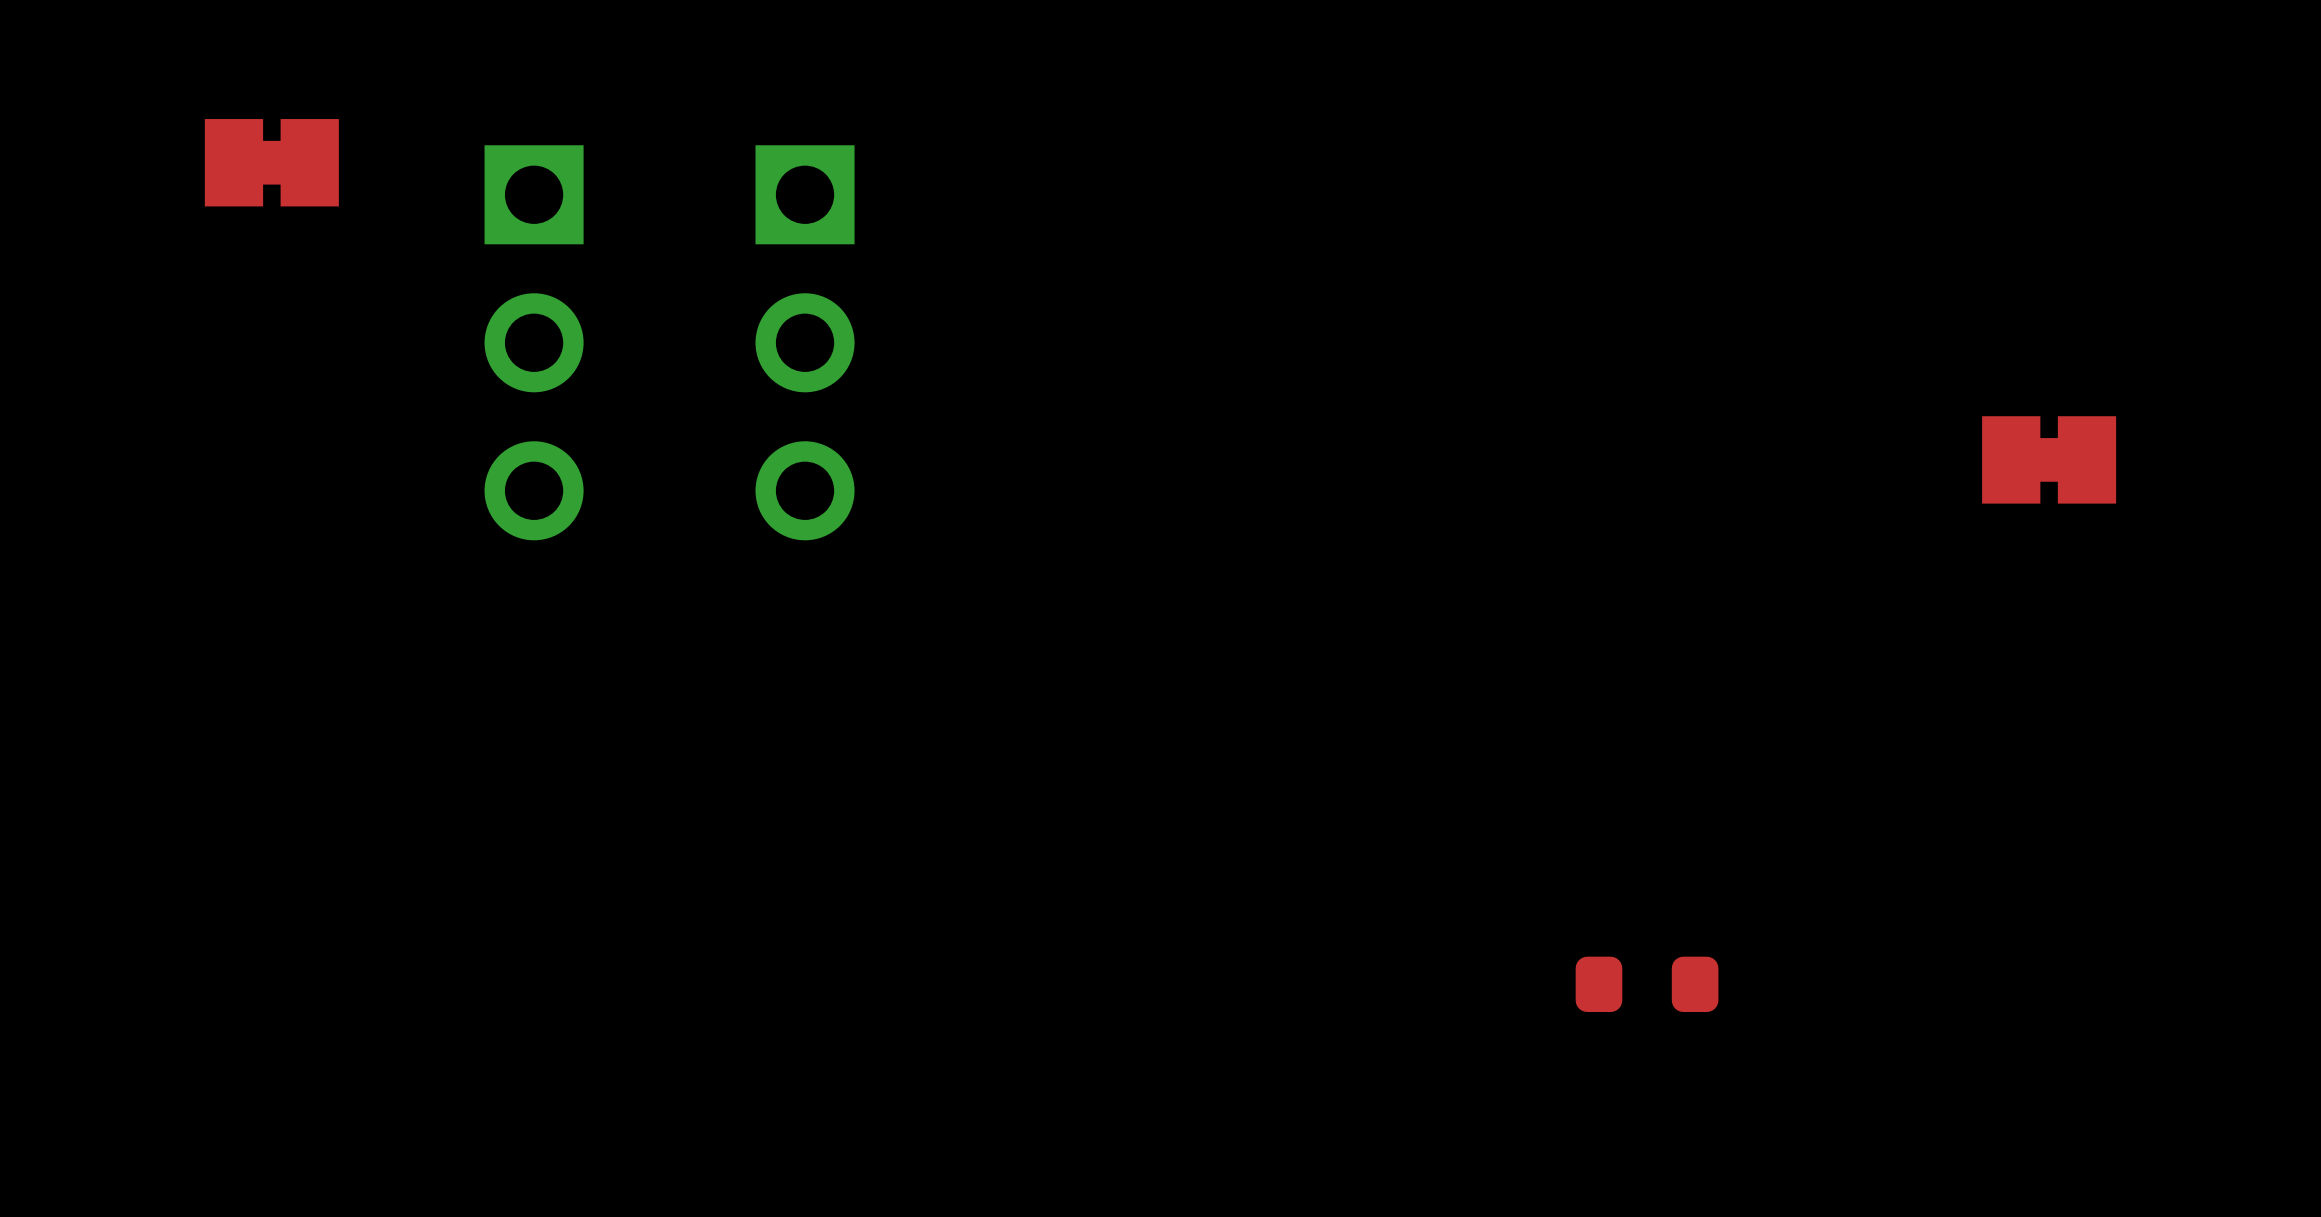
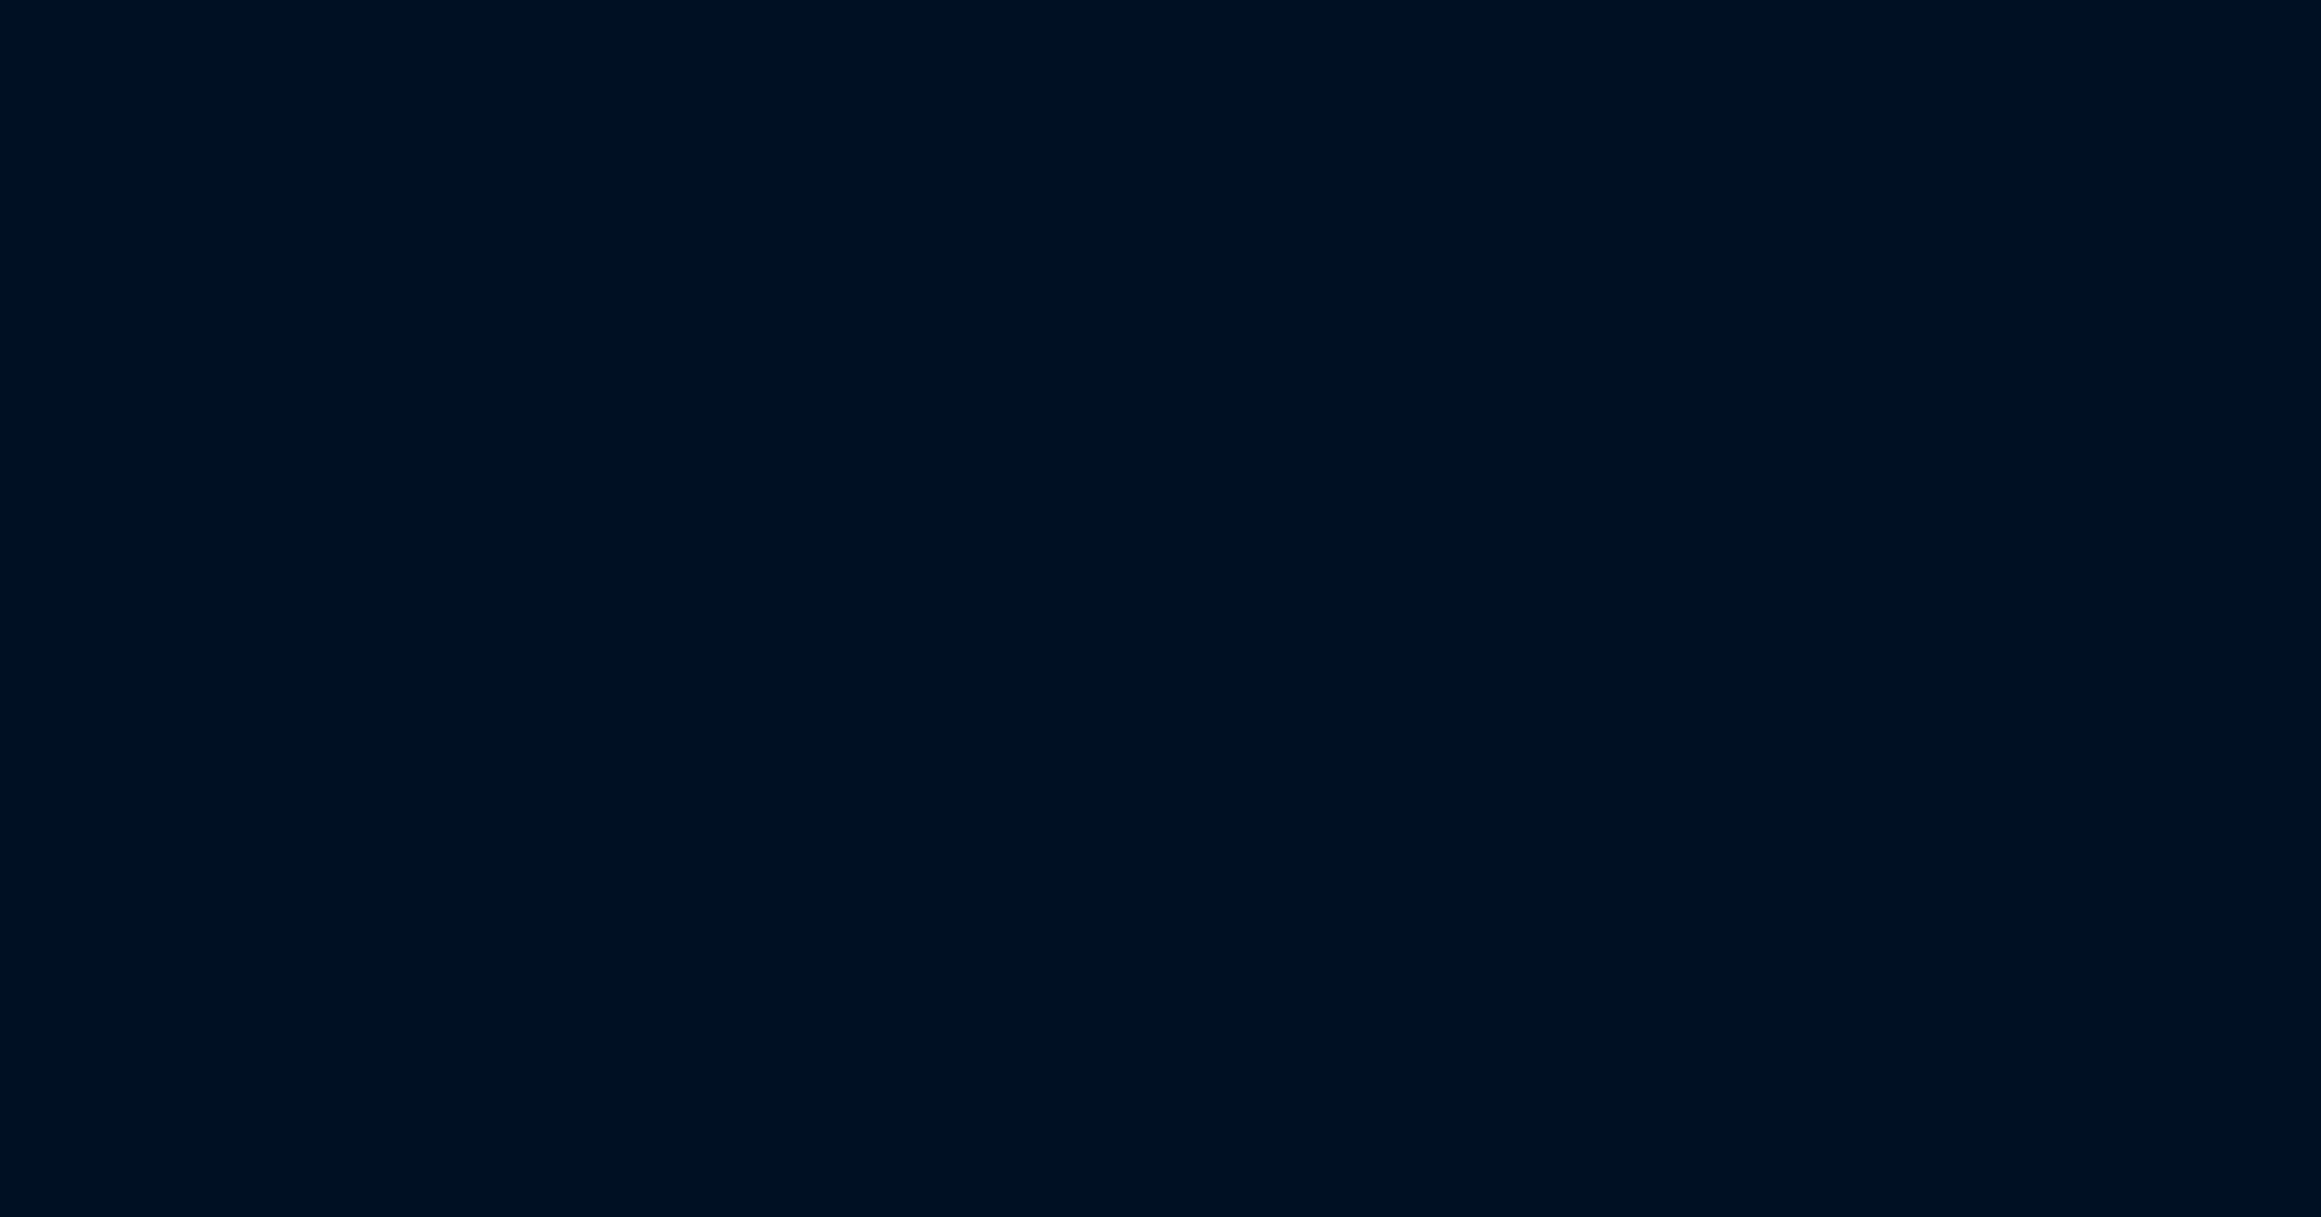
part: (271, 162) -> none
part: (534, 342) -> none
part: (805, 342) -> none
part: (2049, 459) -> none
part: (1647, 984) -> none

